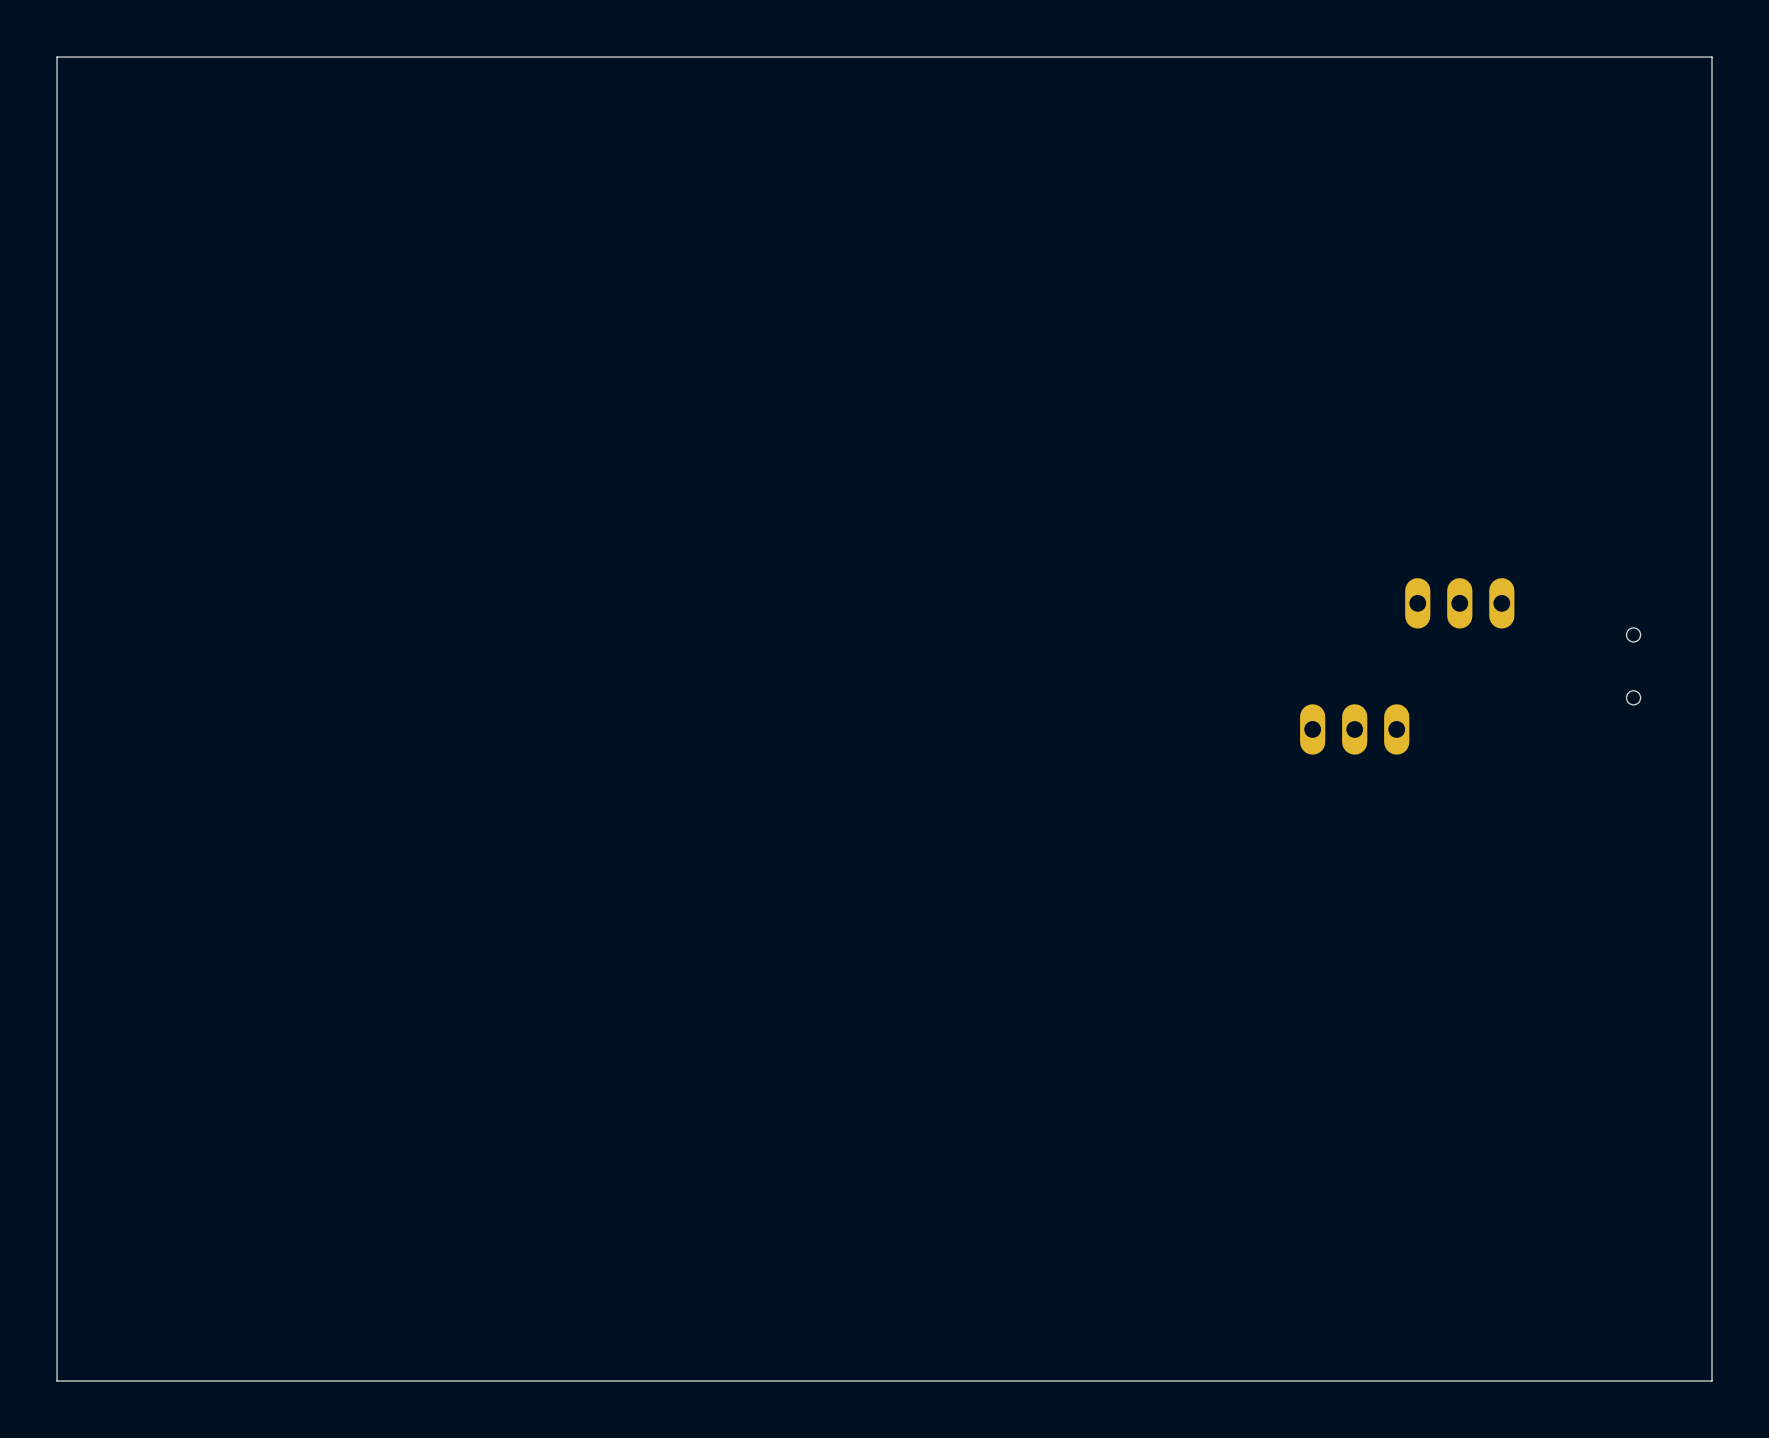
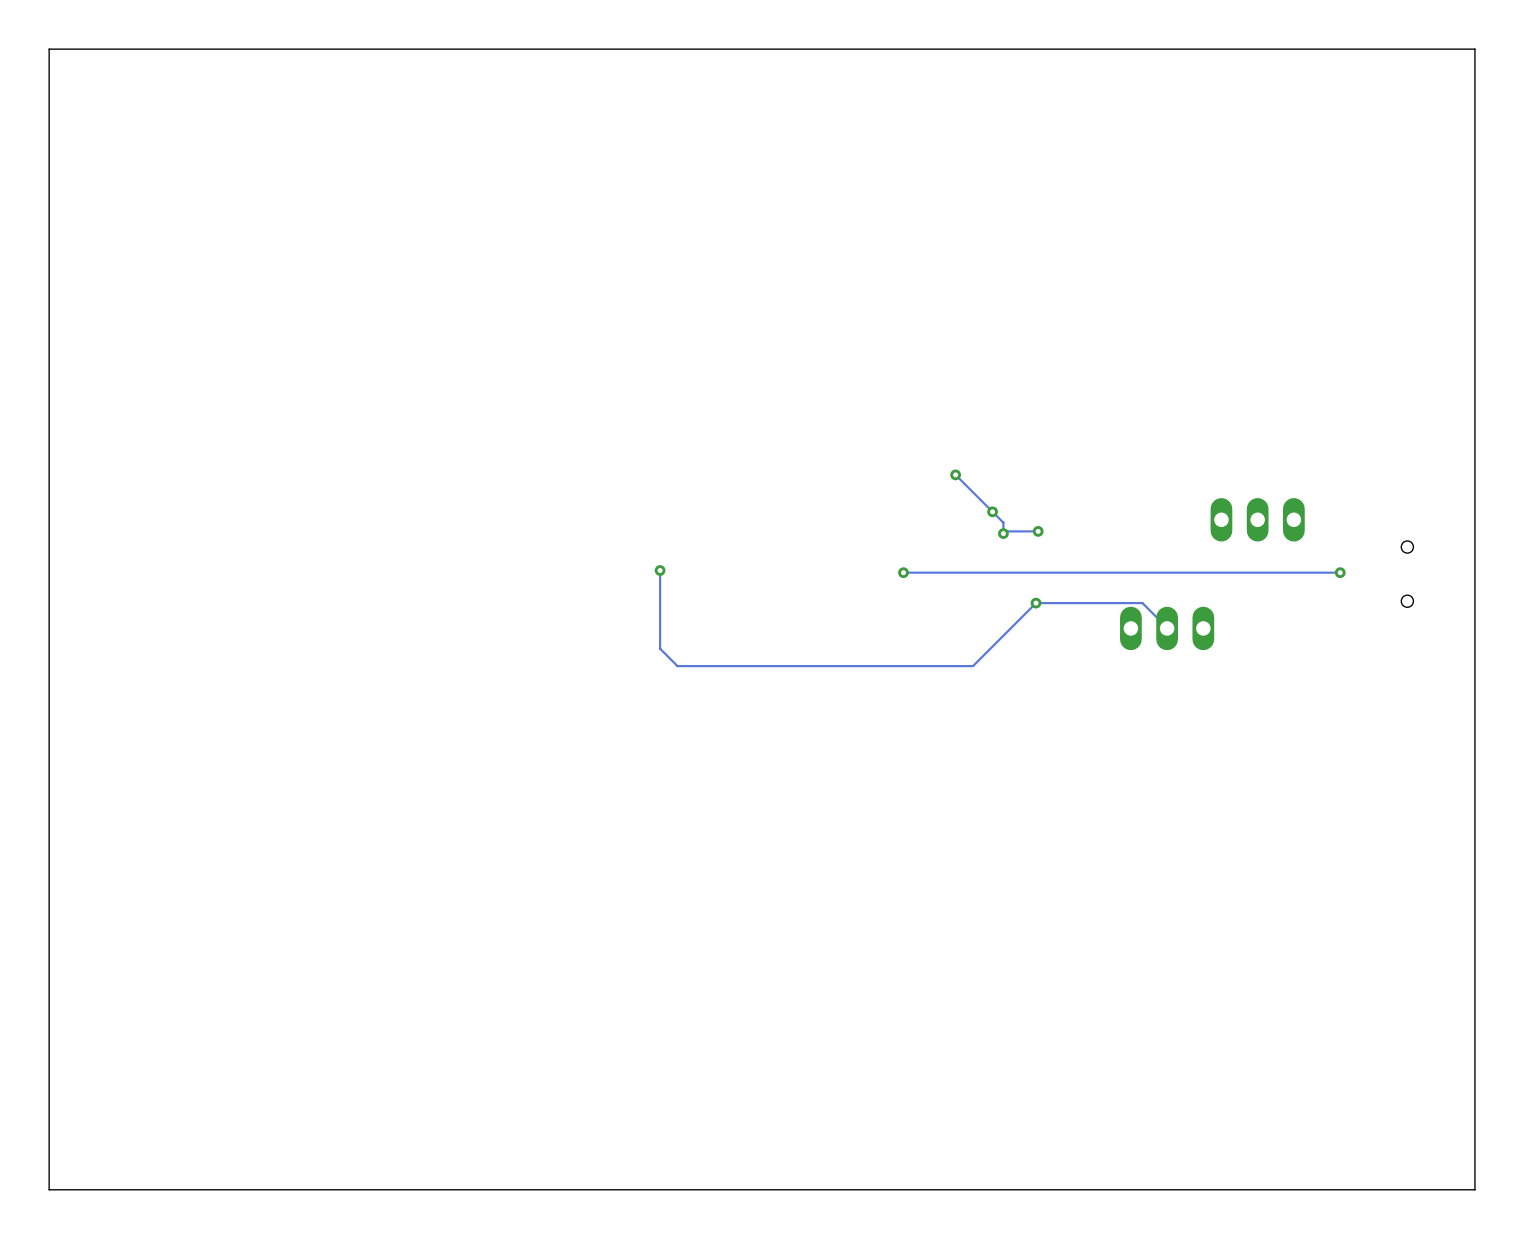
track: none -> (955, 474) (1003, 522) (1003, 533)
via: none -> (955, 474)
via: none -> (992, 511)
track: none -> (1038, 531) (1003, 531)
via: none -> (1038, 531)
via: none -> (1003, 533)
track: none -> (660, 570) (660, 648) (677, 666) (973, 666) (1036, 603) (1142, 603) (1167, 628)
via: none -> (660, 570)
via: none -> (903, 572)
track: none -> (1340, 572) (903, 572)
via: none -> (1340, 572)
via: none -> (1036, 603)

